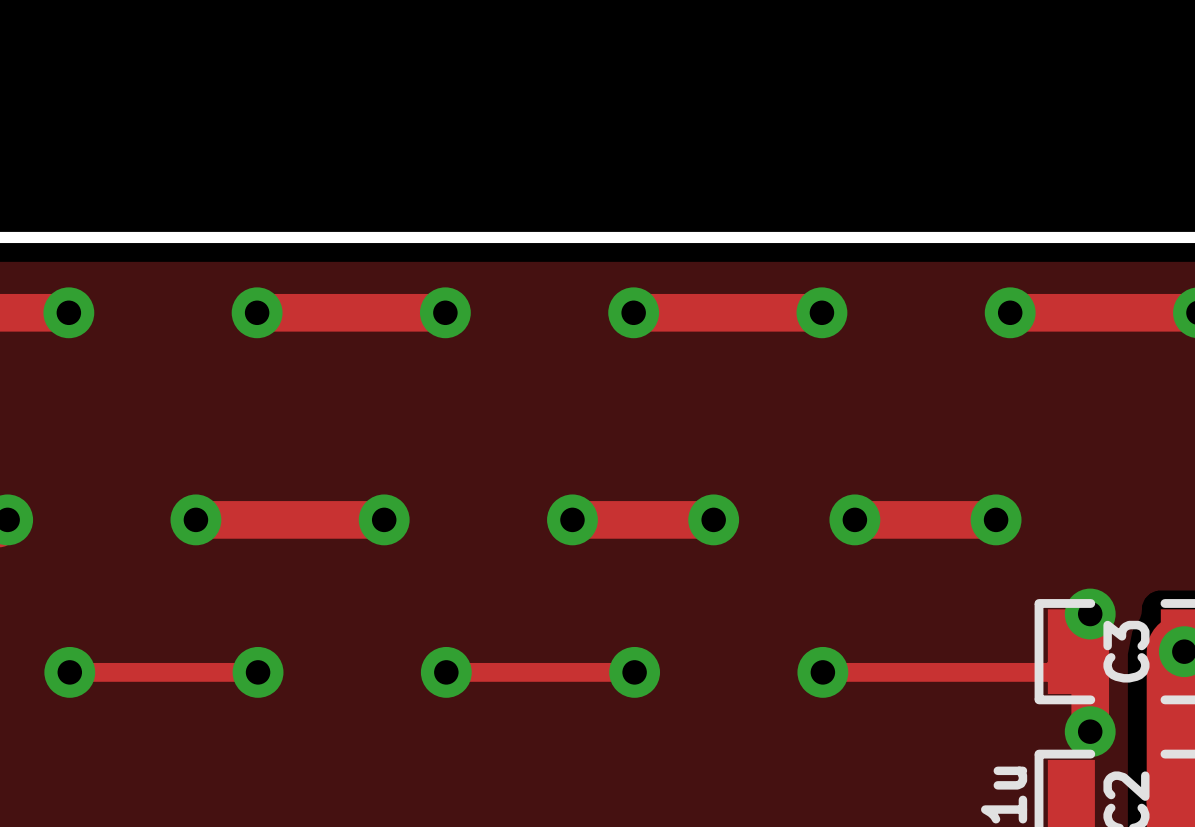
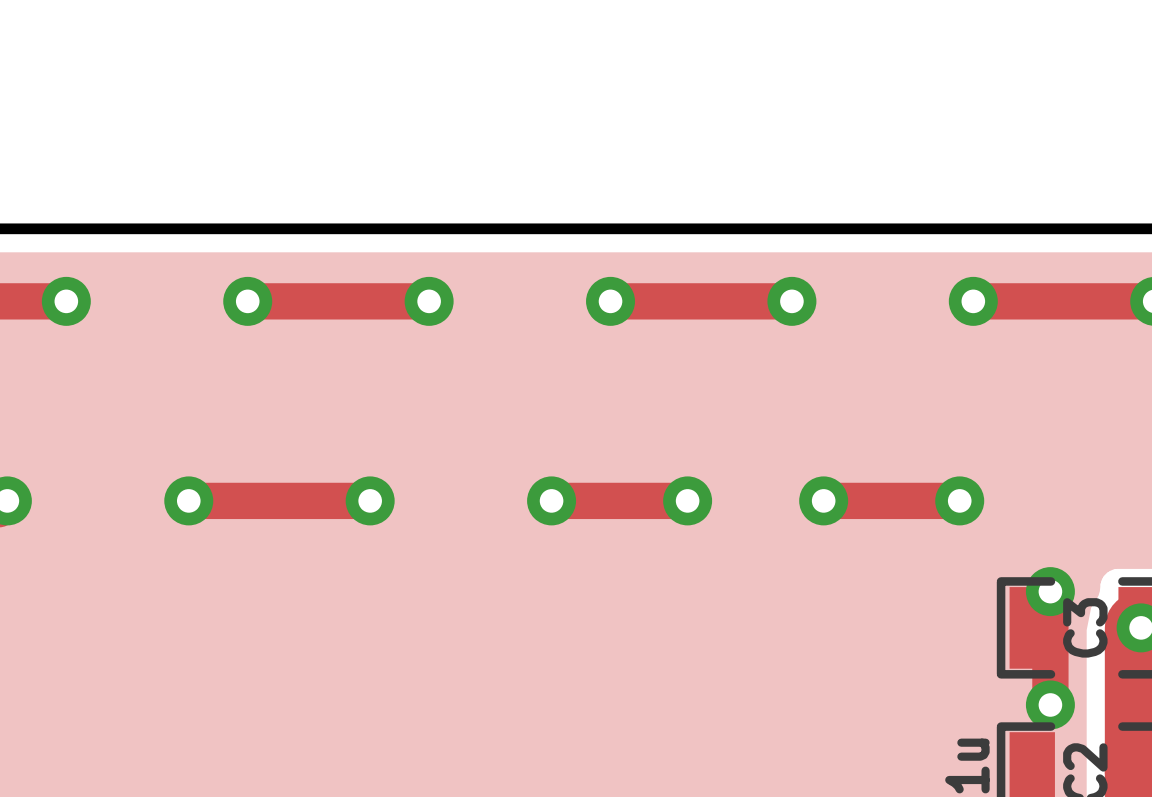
track: (1071, 651) (1050, 672) (822, 672) -> none
track: (69, 672) (258, 672) -> none
via: (69, 672) -> none
via: (258, 672) -> none
track: (446, 672) (634, 672) -> none
via: (446, 672) -> none
via: (634, 672) -> none
via: (822, 672) -> none

